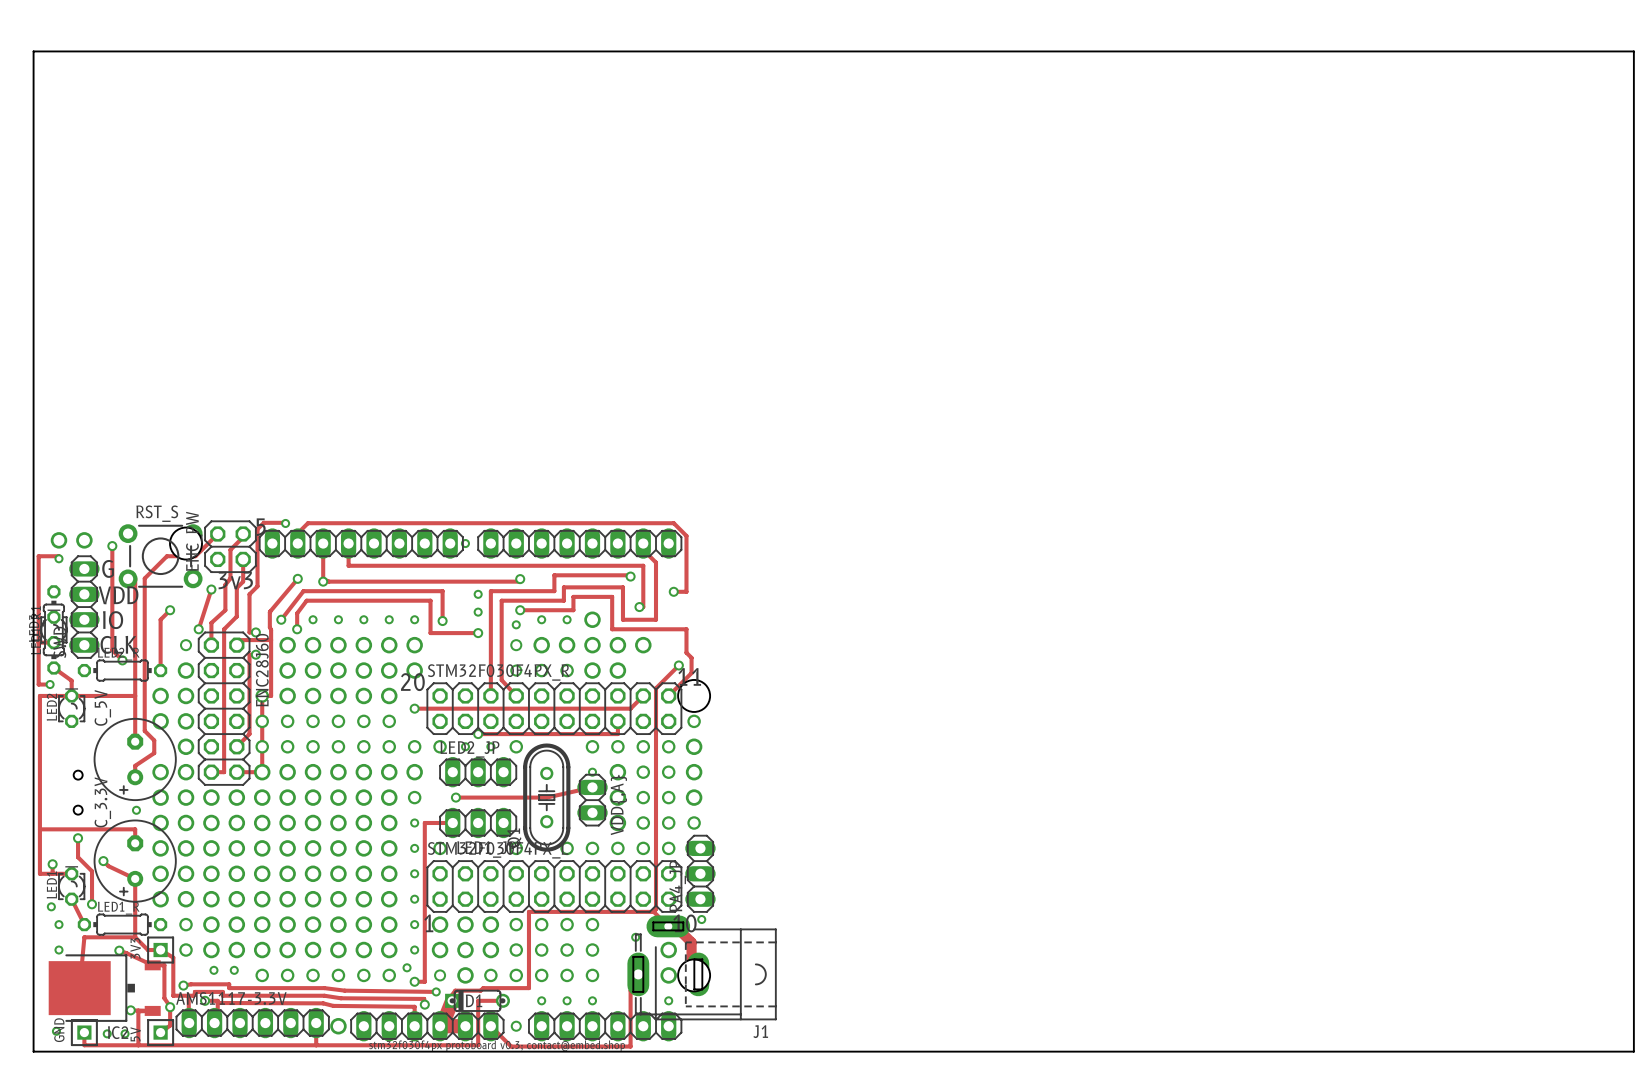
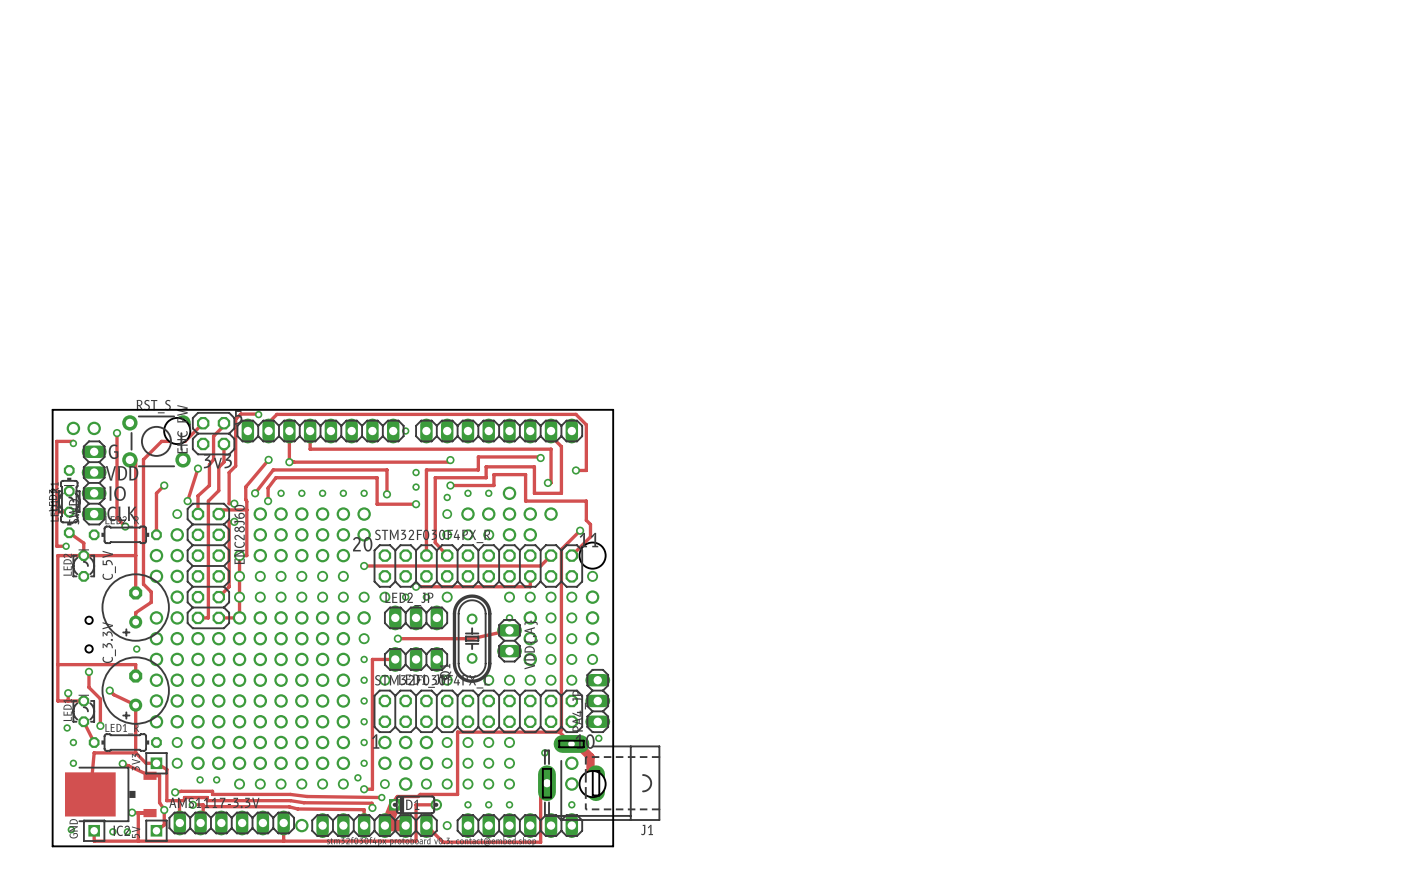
board edge: (33, 517) (33, 51) (1633, 51) (1633, 1051) (719, 1051) -> (52, 409) (613, 409) (613, 846)

